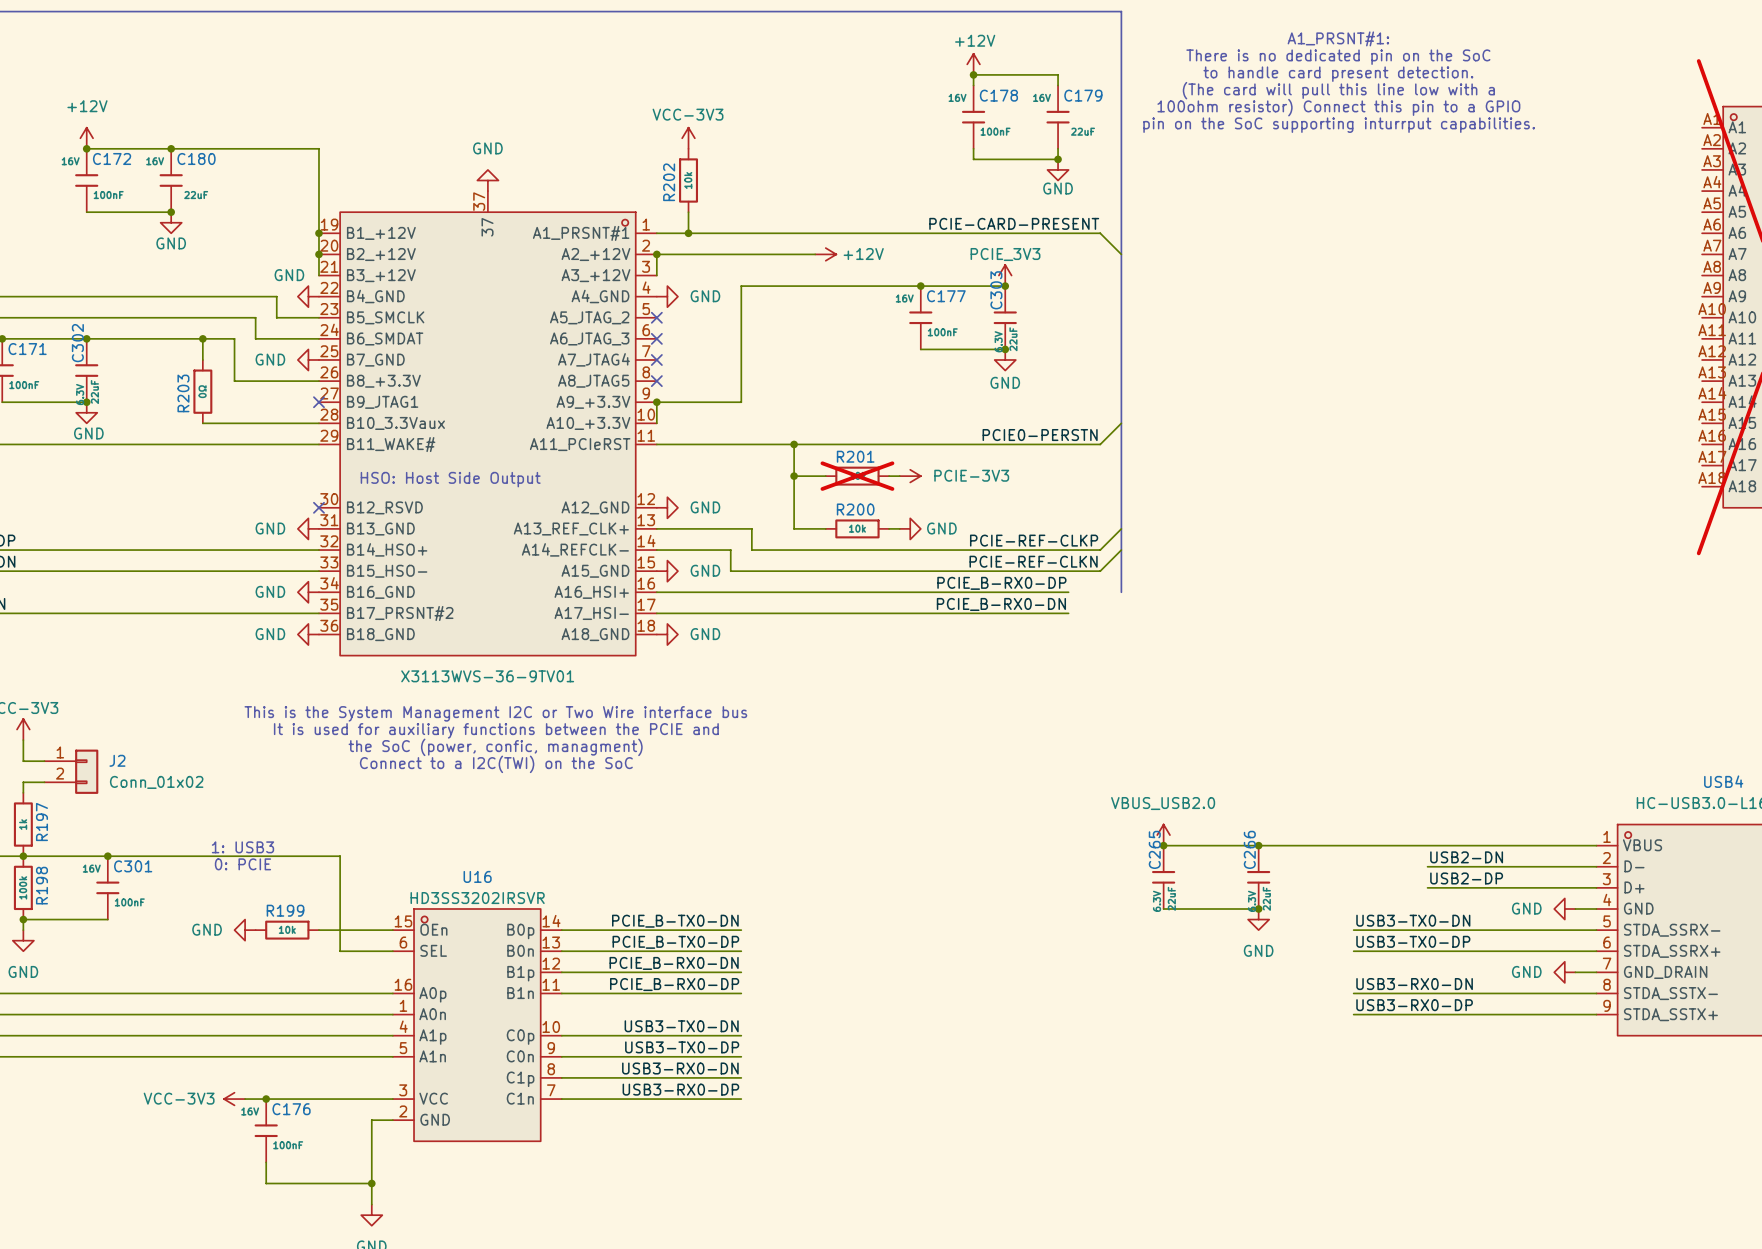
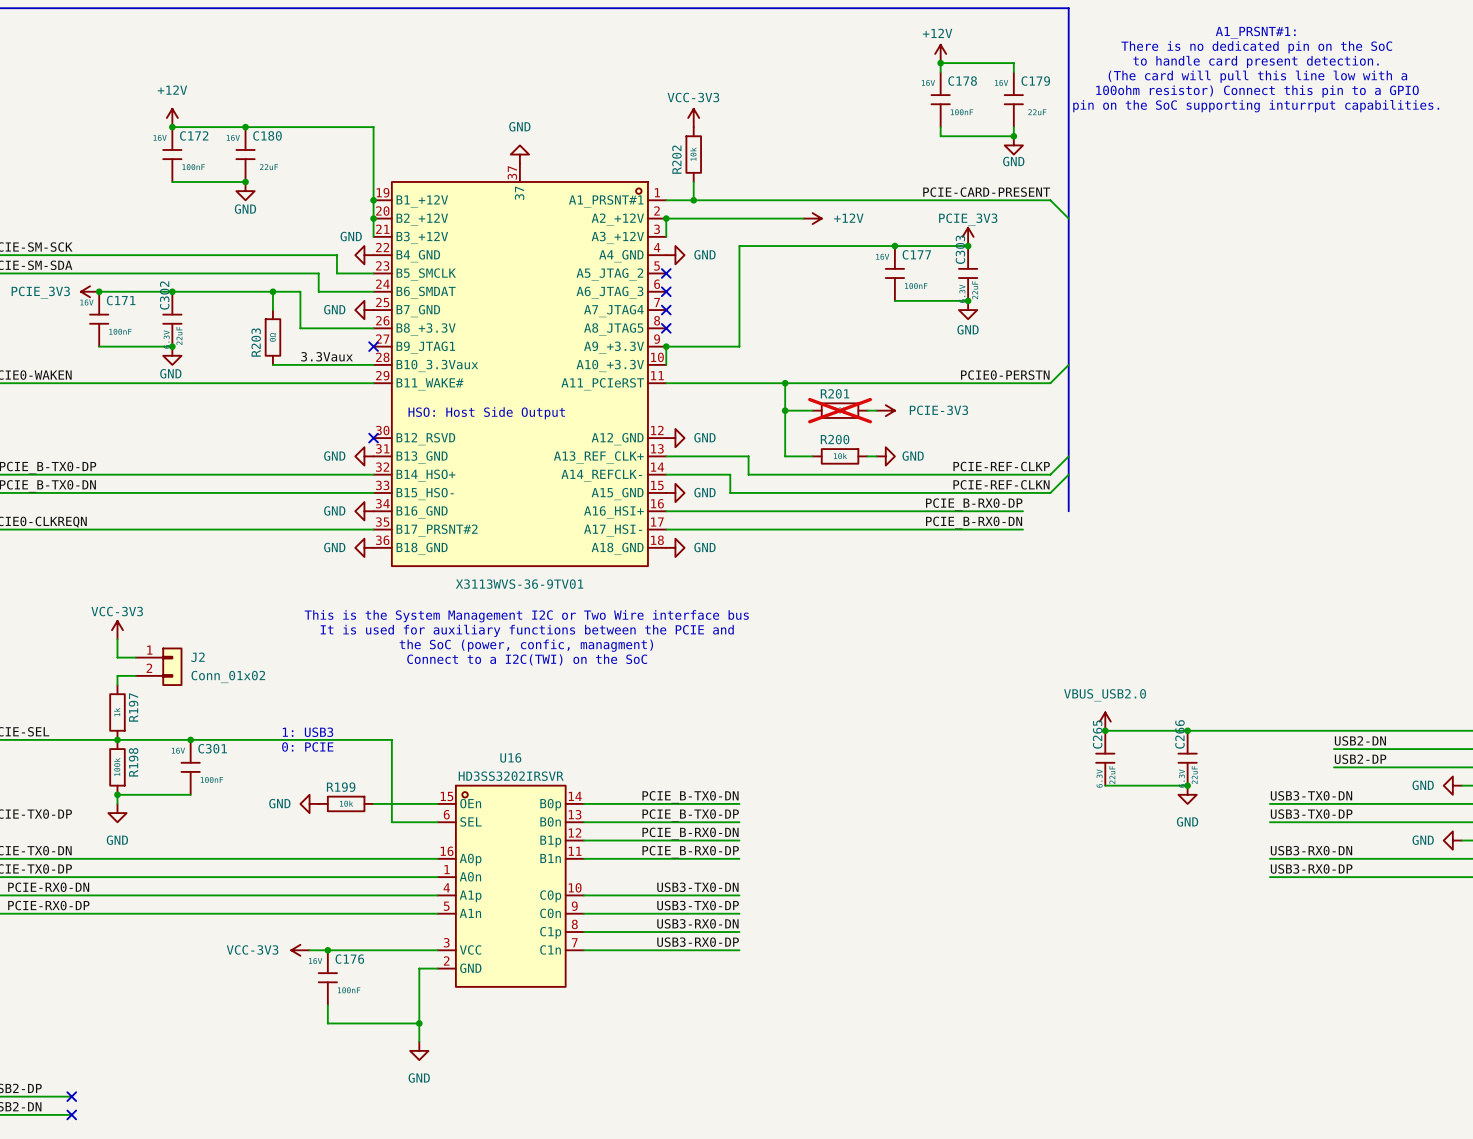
label: none -> 3.3Vaux (327, 356)

